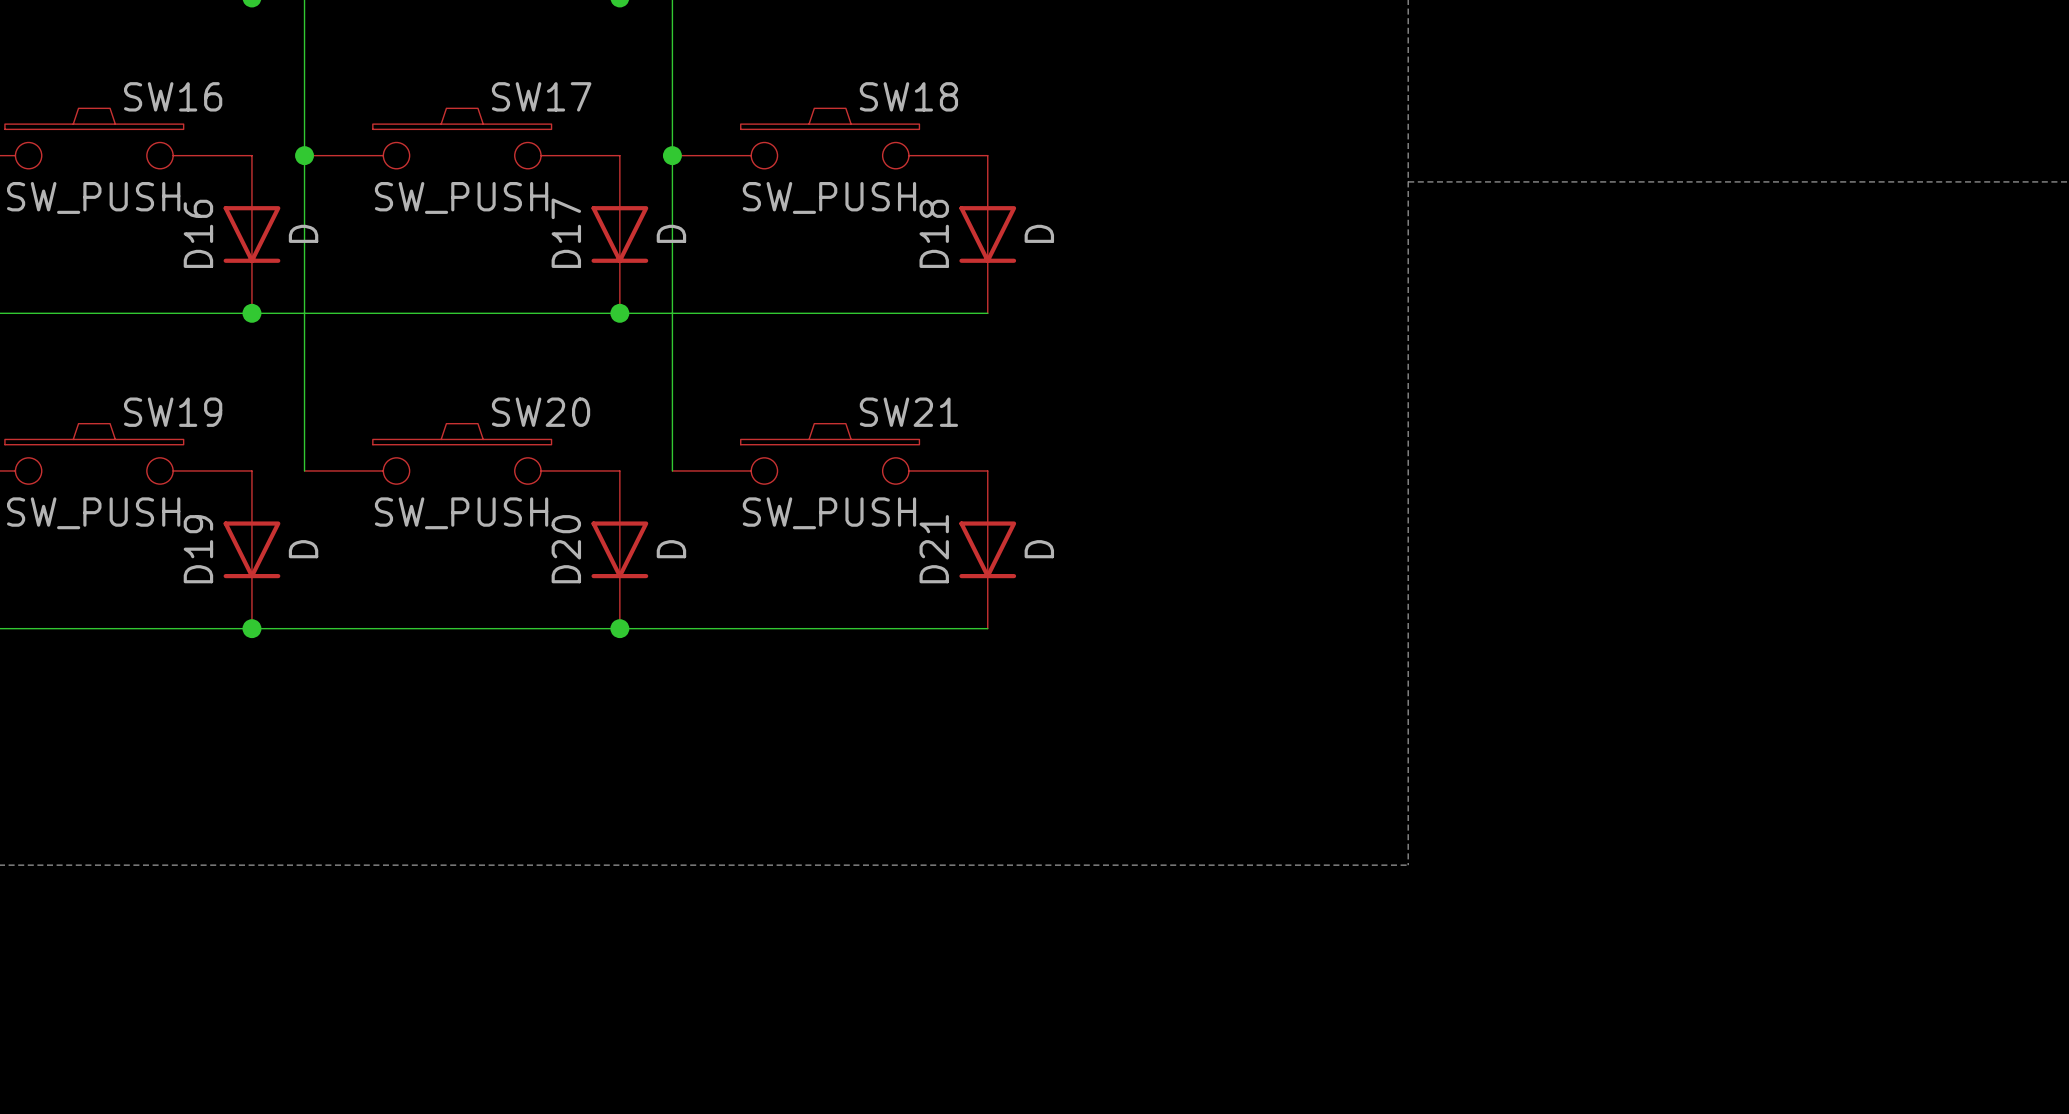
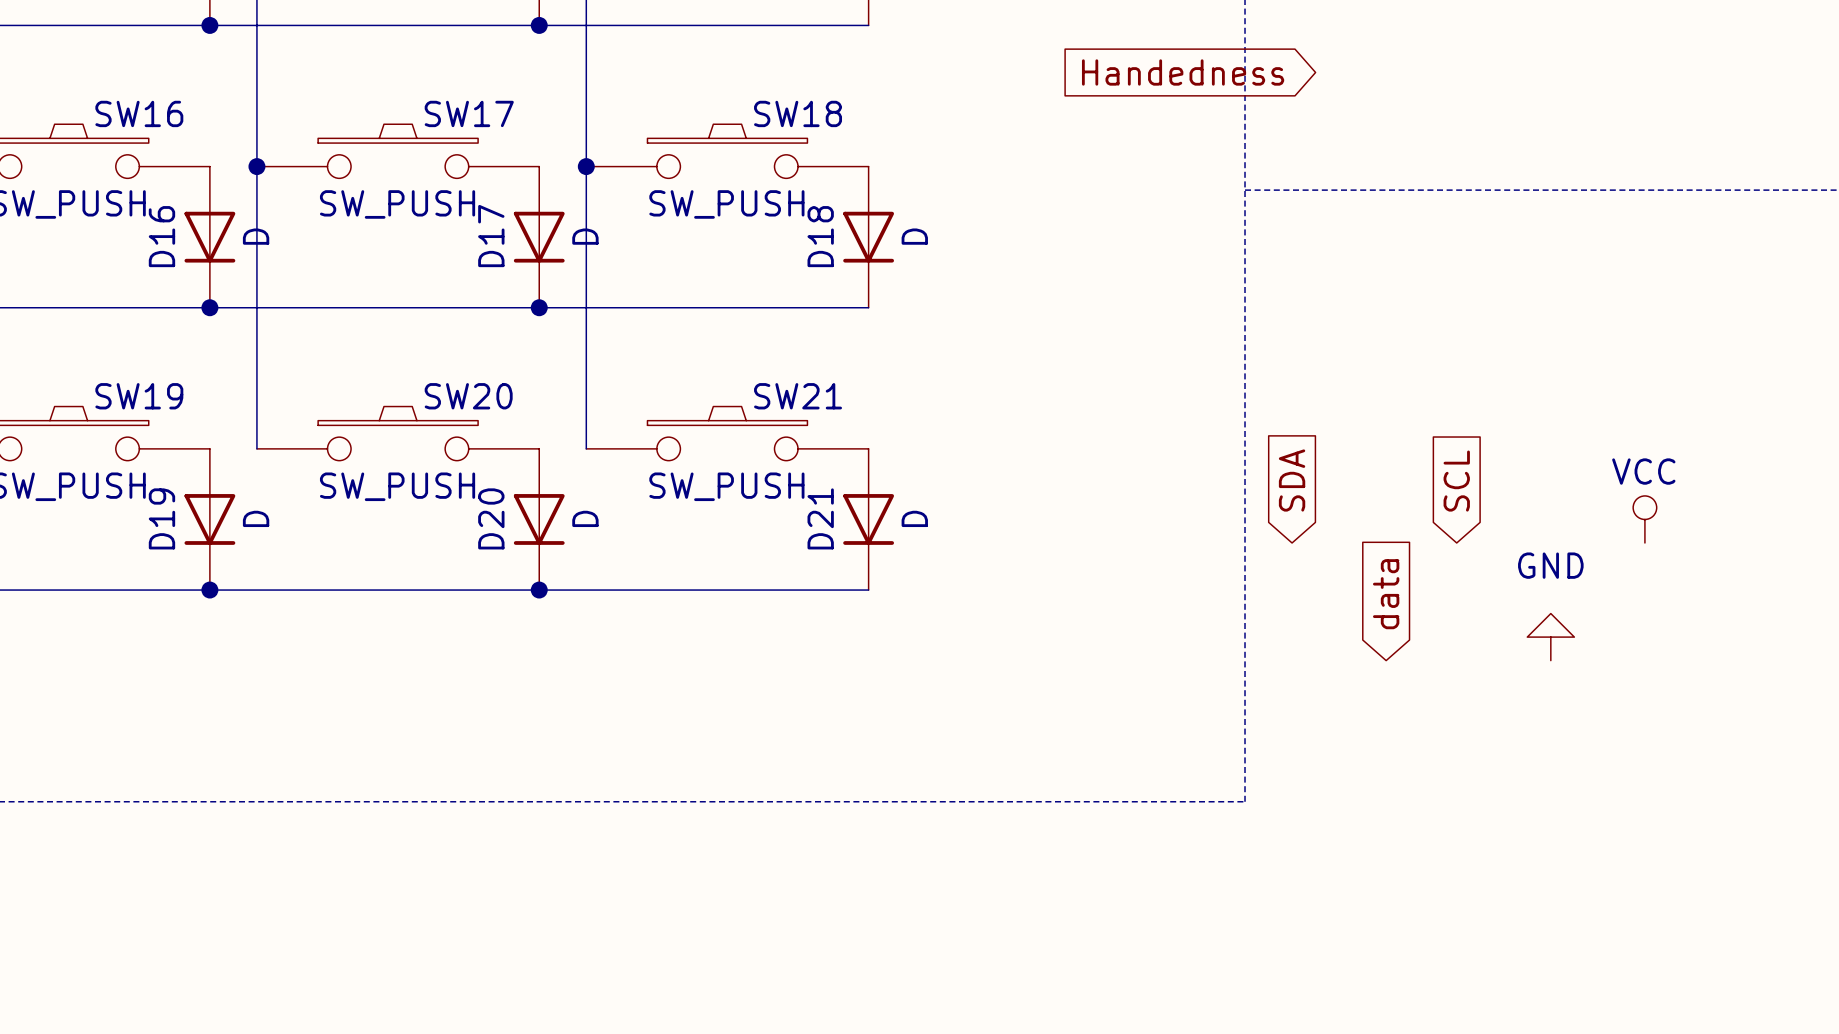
global label: none -> Handedness (1183, 72)
global label: none -> SDA (1292, 480)
global label: none -> SCL (1456, 481)
power symbol: none -> VCC (1644, 519)
global label: none -> data (1386, 594)
power symbol: none -> GND (1550, 637)

